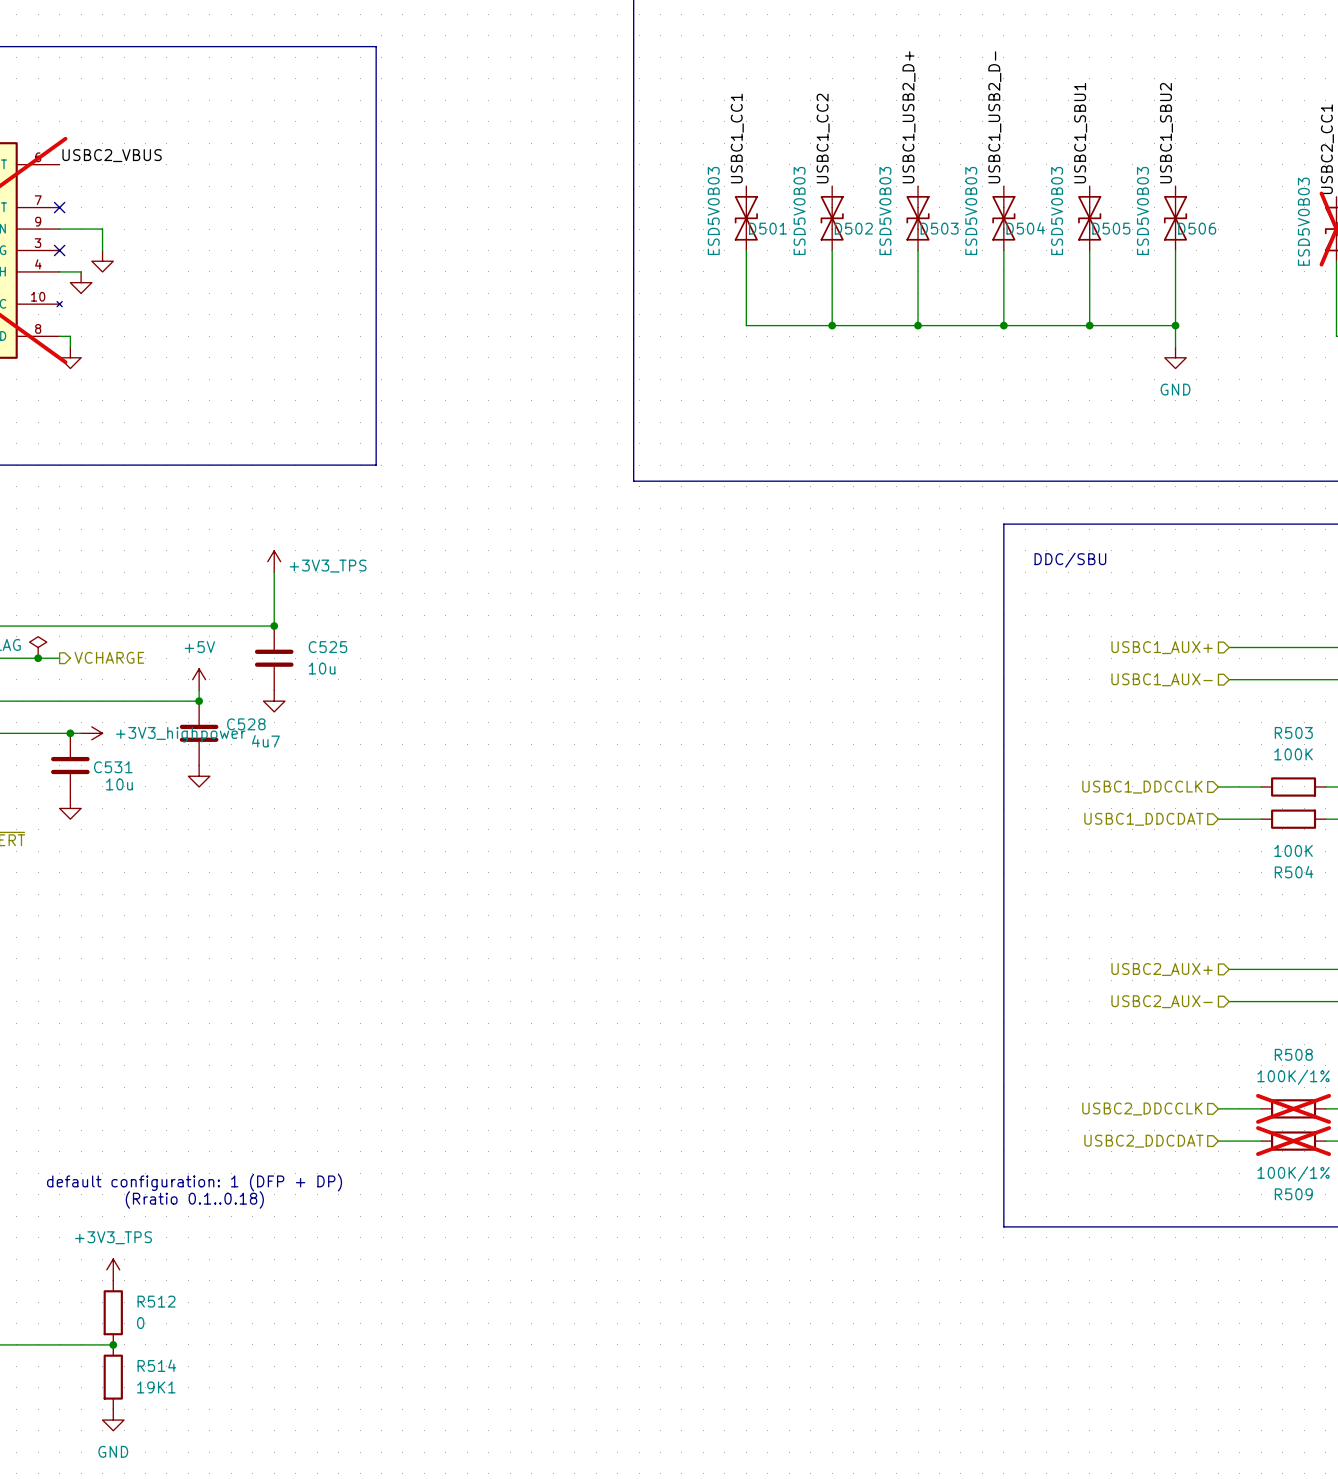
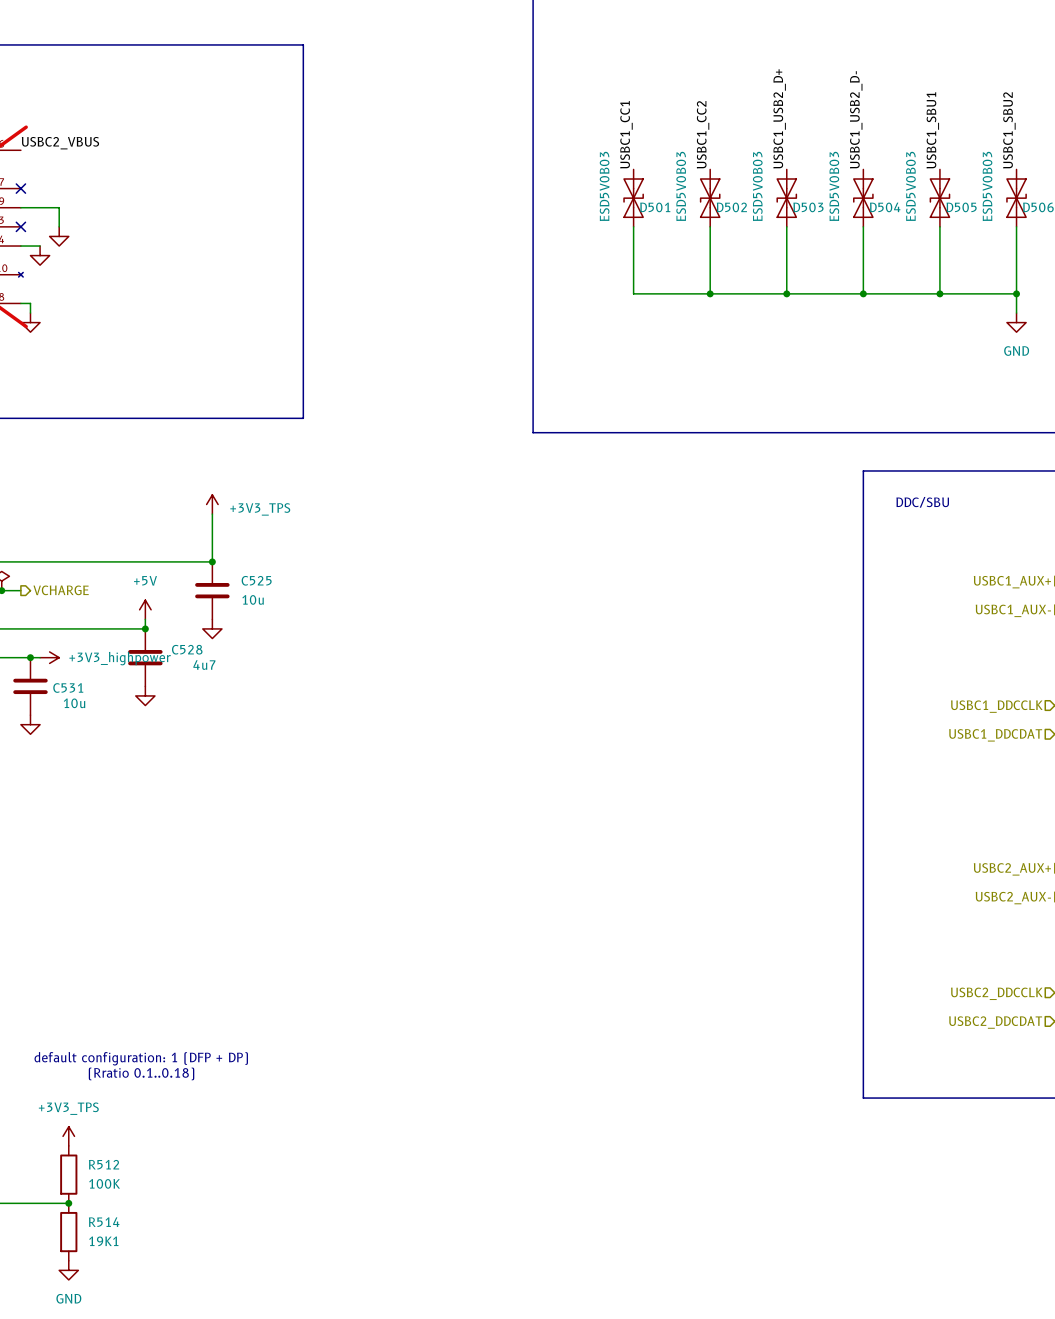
R512 value: 0 (140, 1323) -> 100K (104, 1183)

